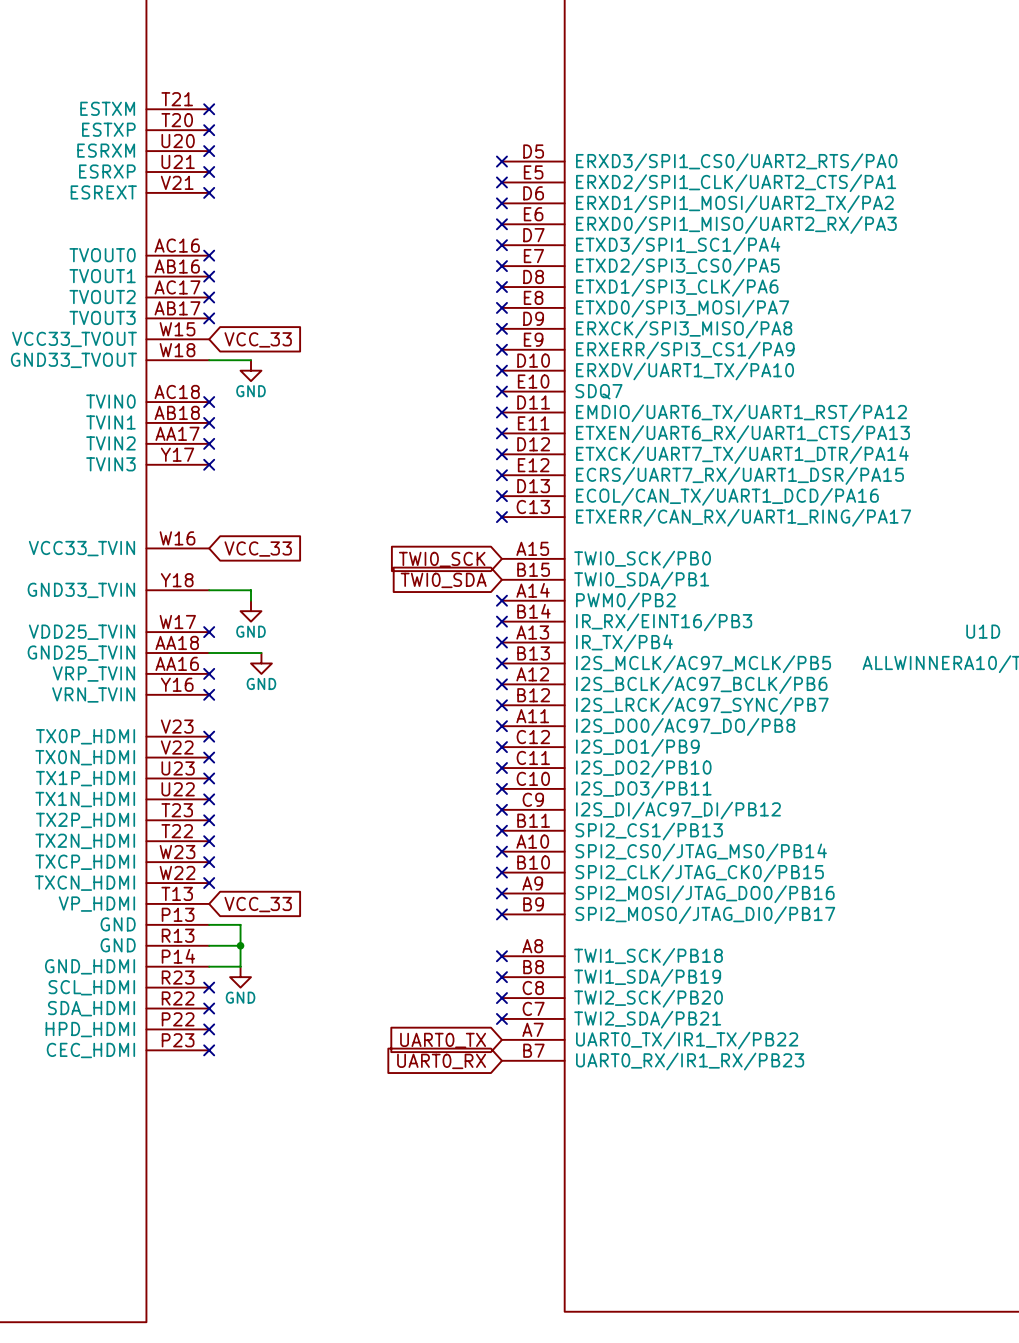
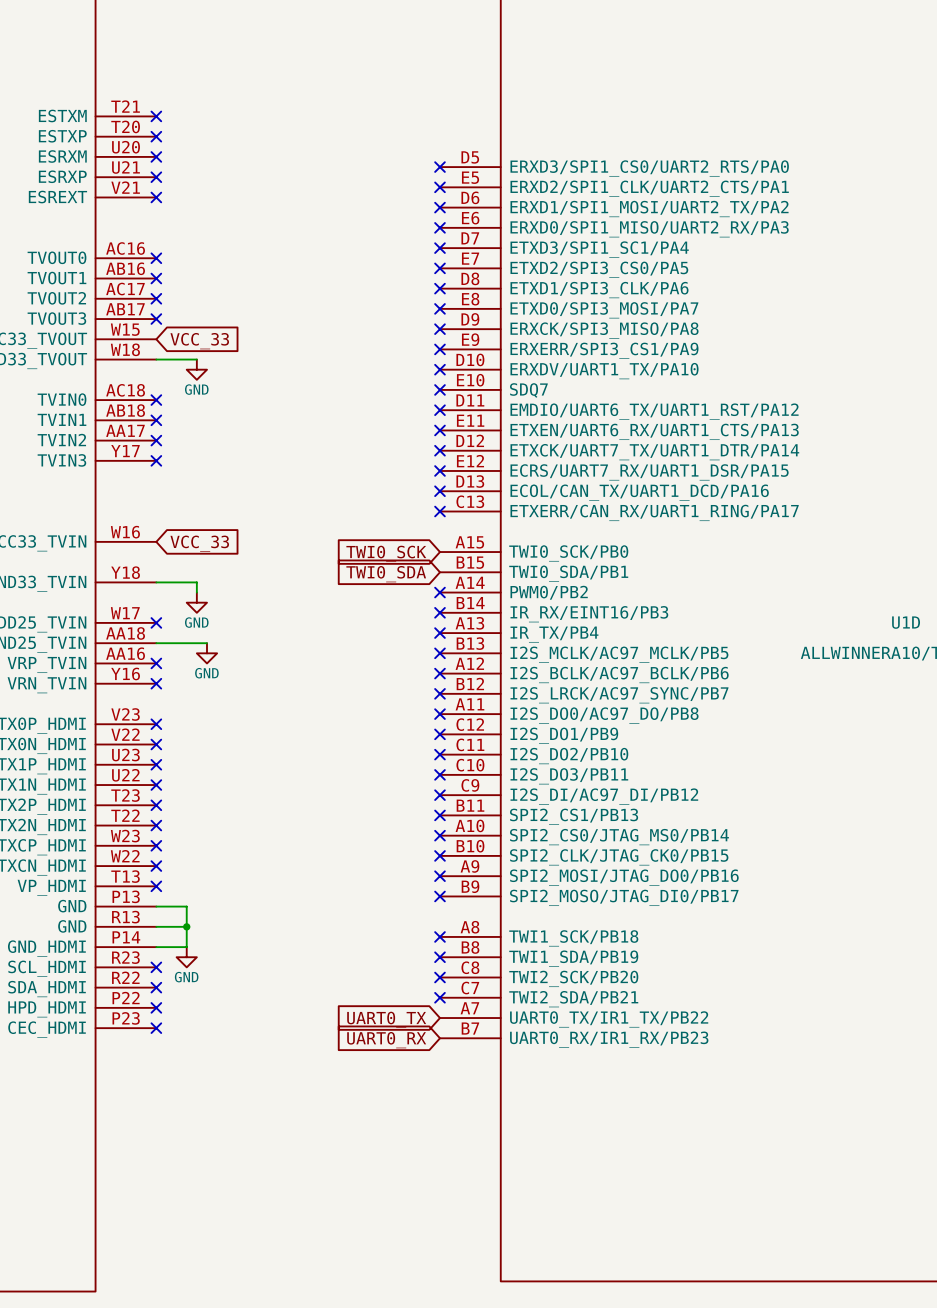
no-connect mark: none -> (156, 886)
global label: VCC_33 (258, 904) -> none

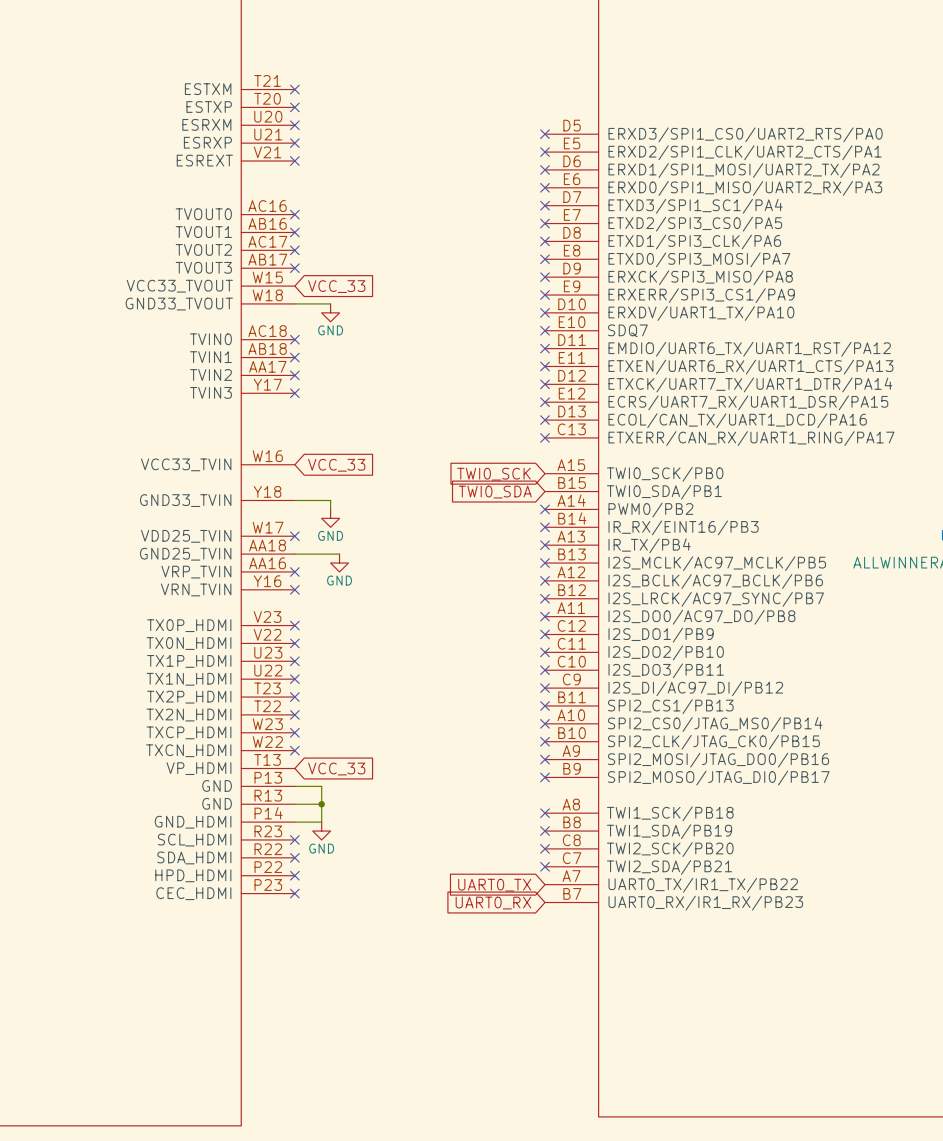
no-connect mark: (156, 886) -> none
global label: none -> VCC_33 (336, 769)

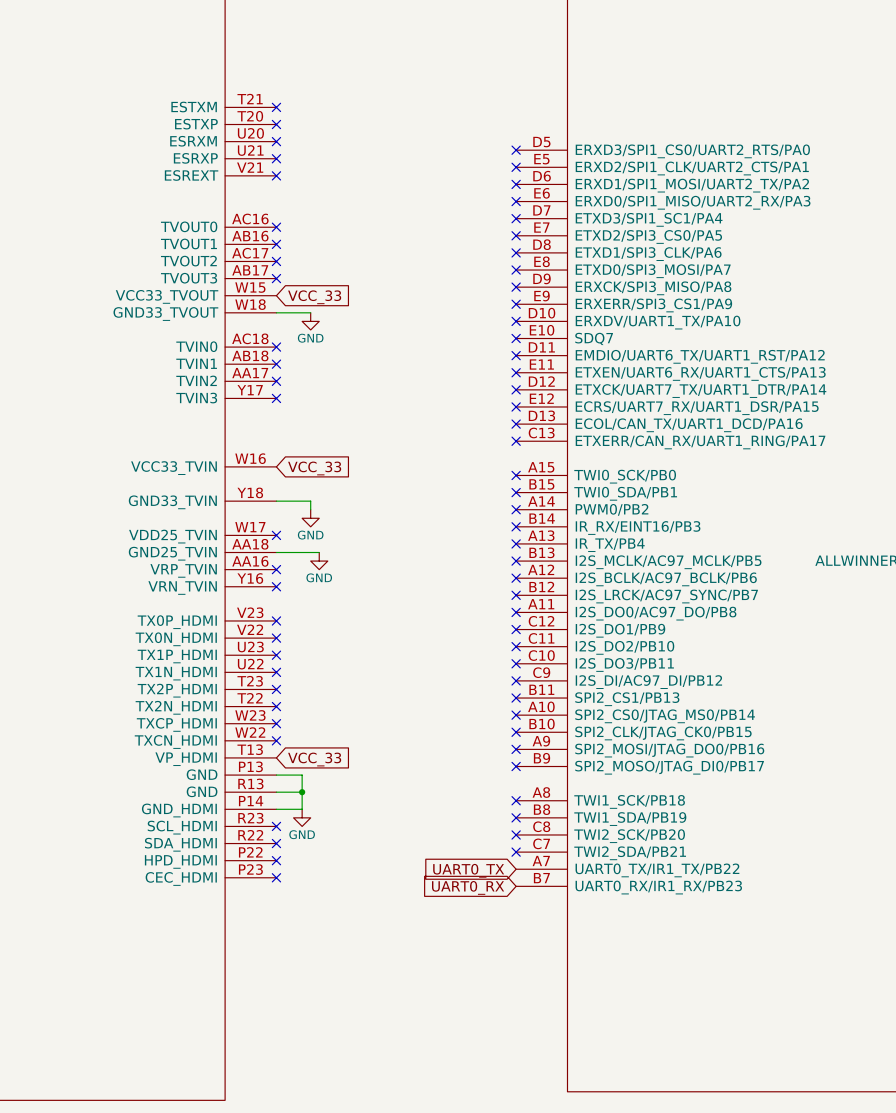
no-connect mark: none -> (516, 475)
global label: TWI0_SCK (493, 474) -> none
no-connect mark: none -> (516, 492)
global label: TWI0_SDA (495, 492) -> none

